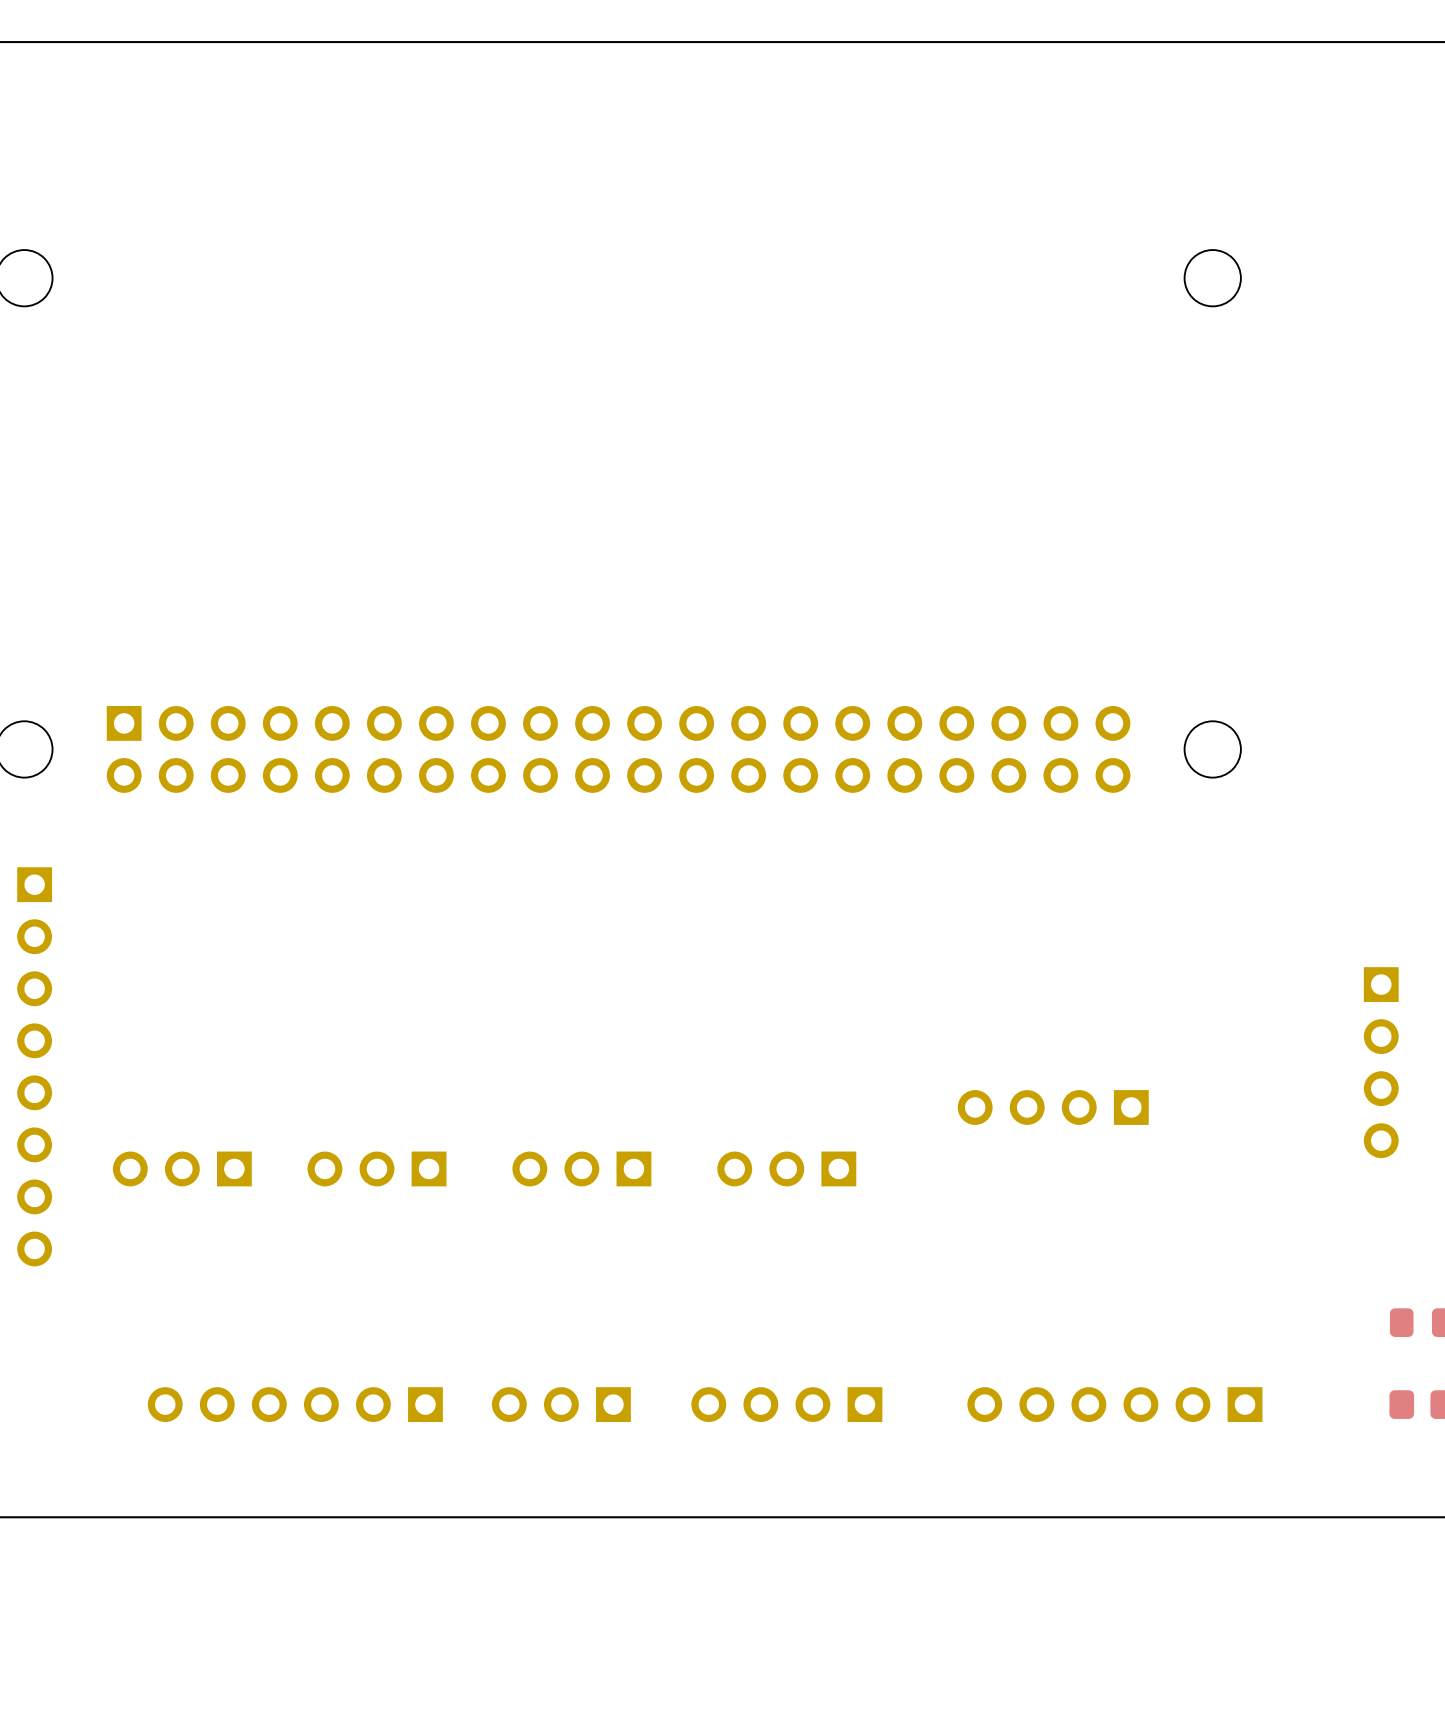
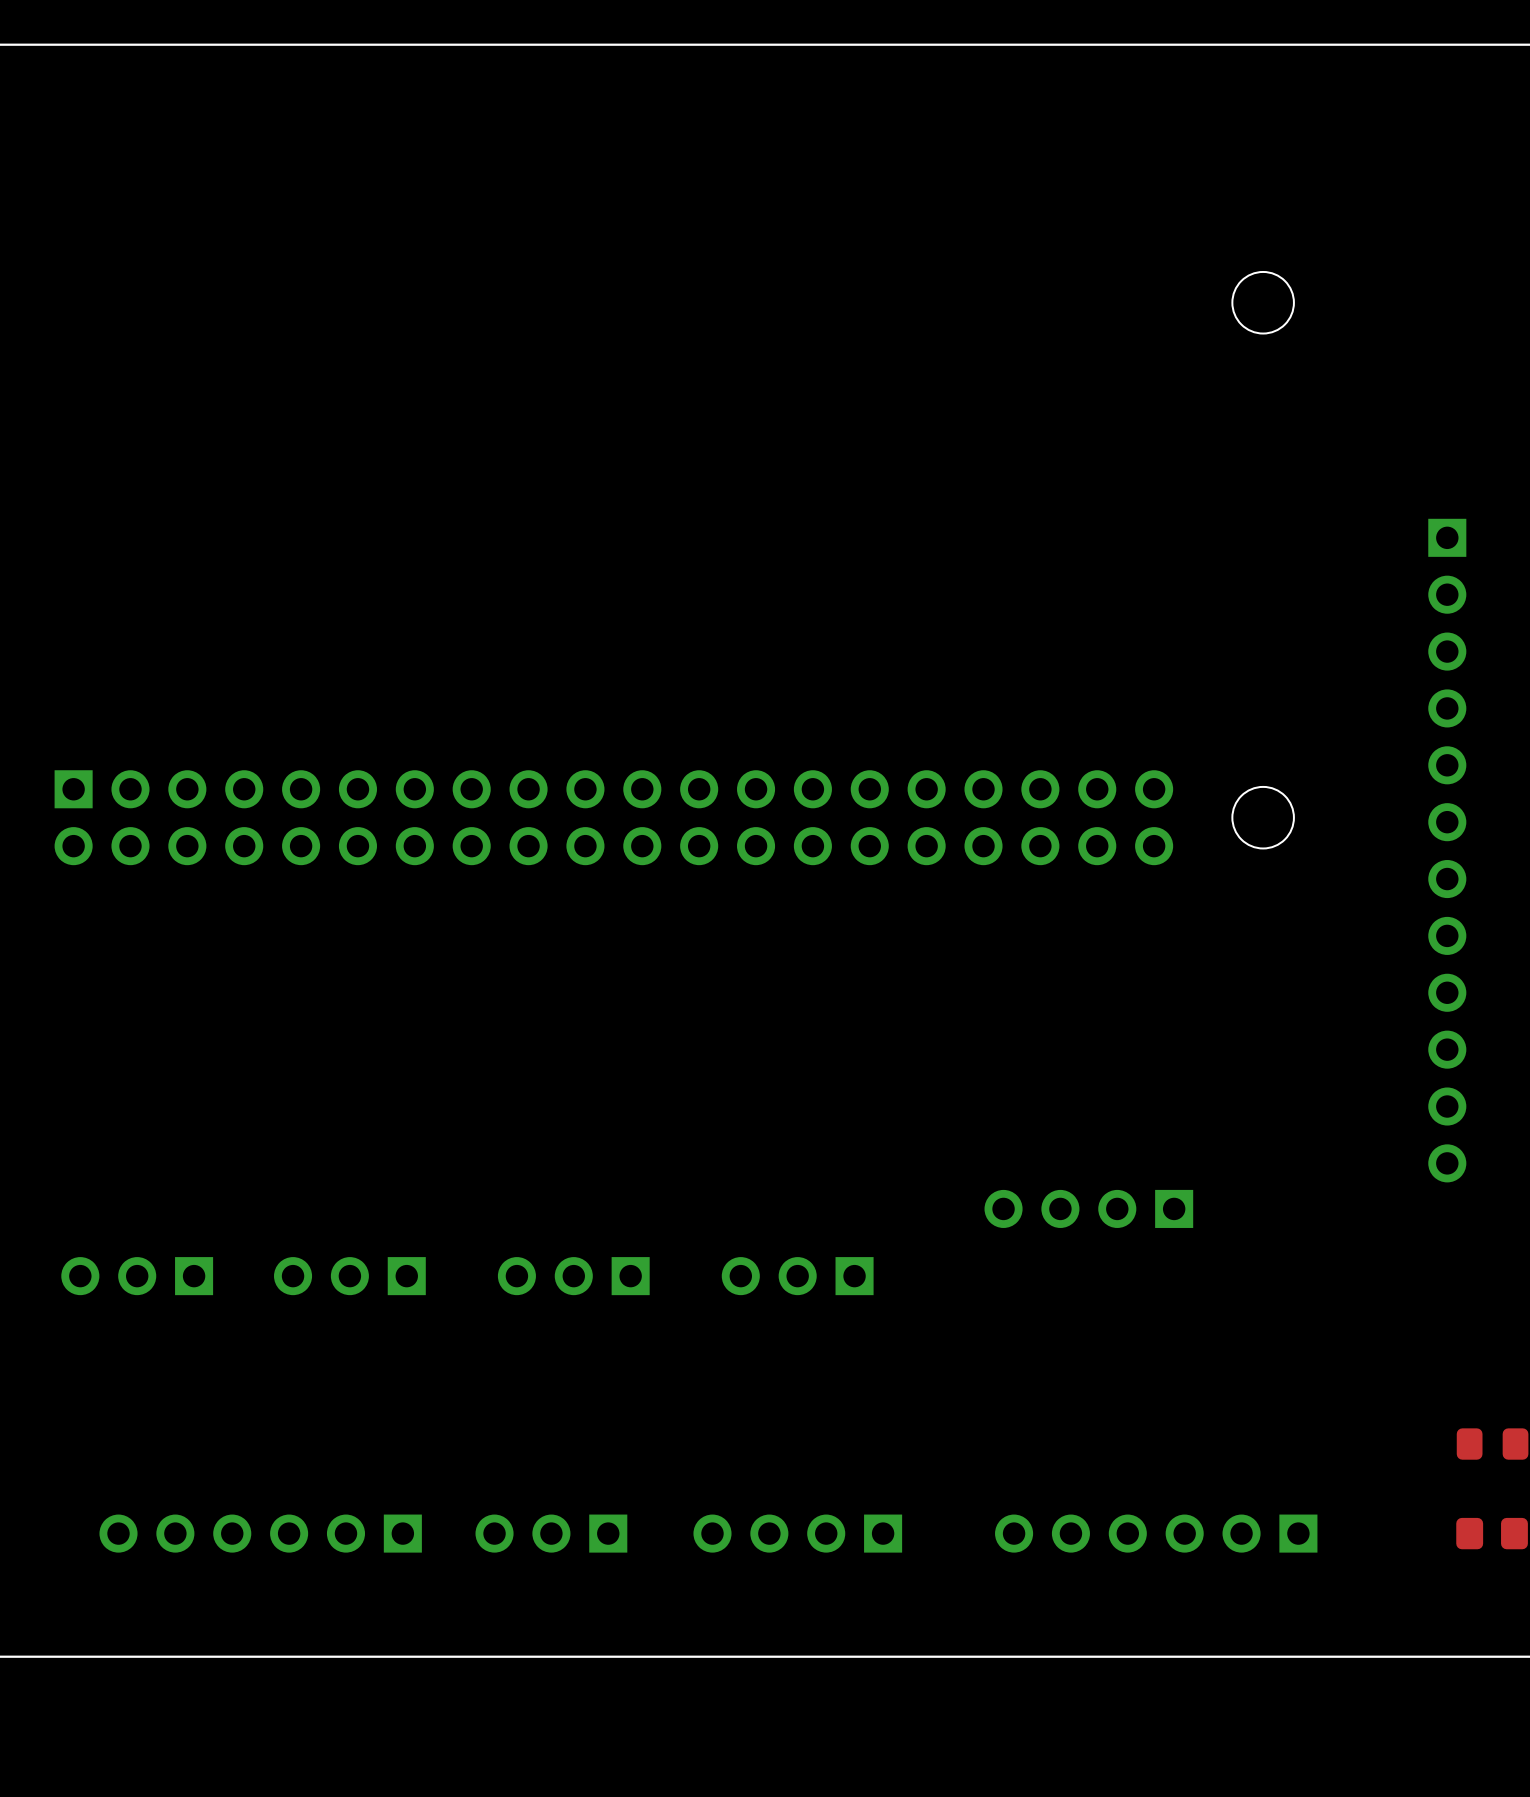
part: none -> (1447, 850)
part: (1381, 1062) -> none

